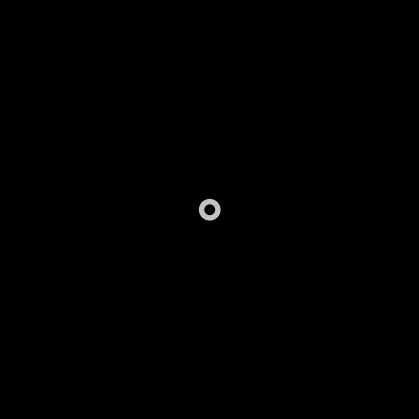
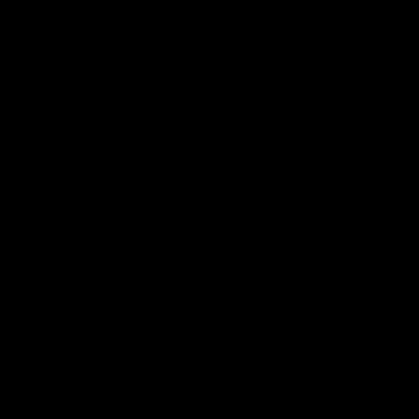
via: (209, 209) -> none

